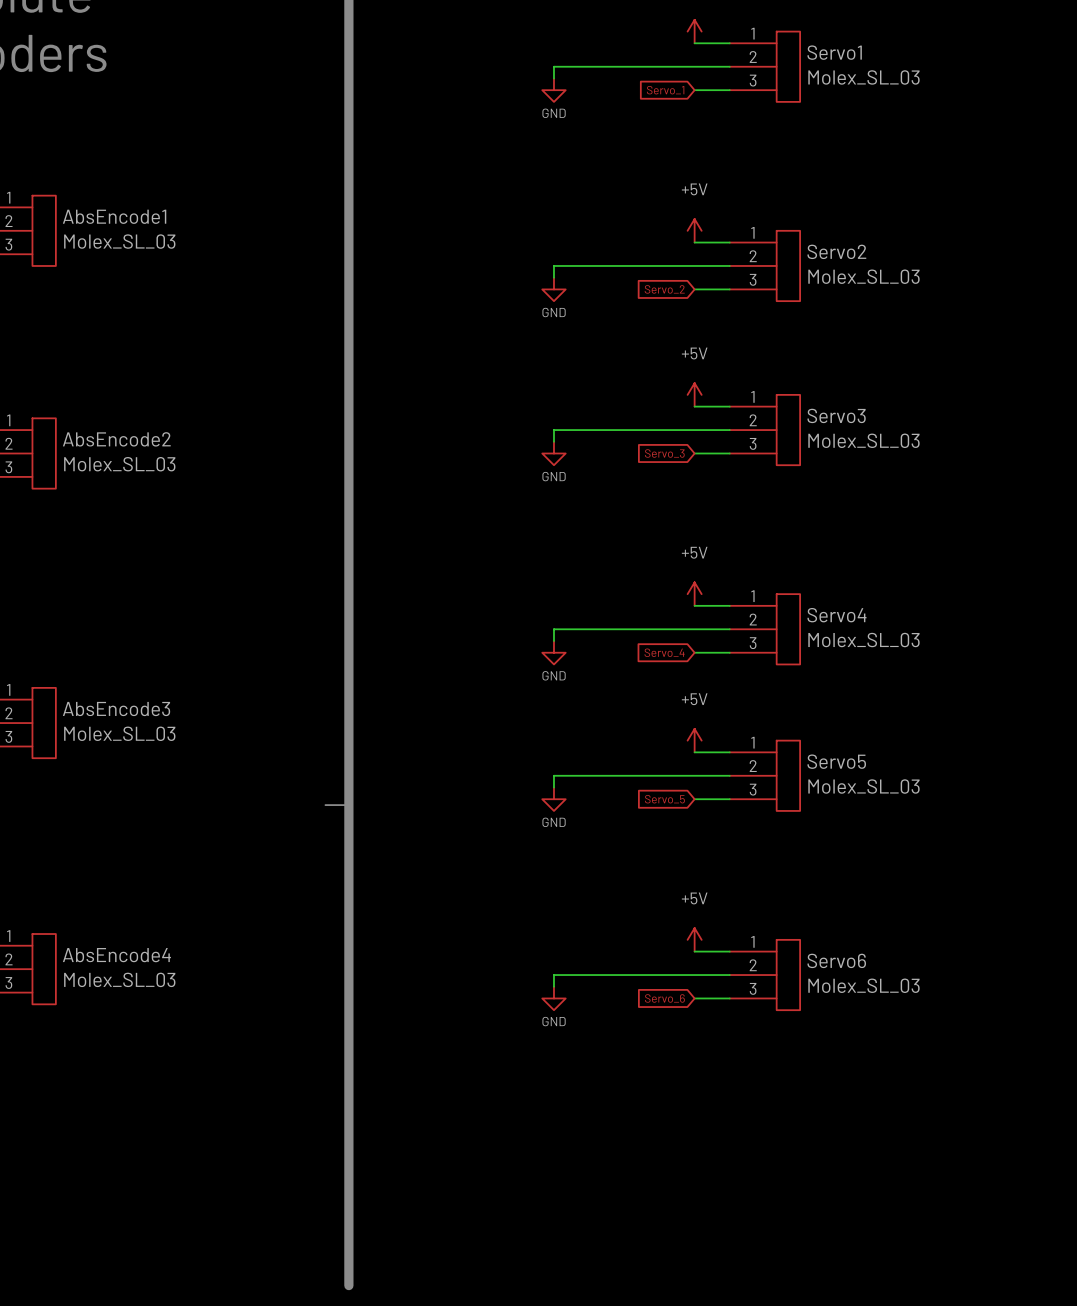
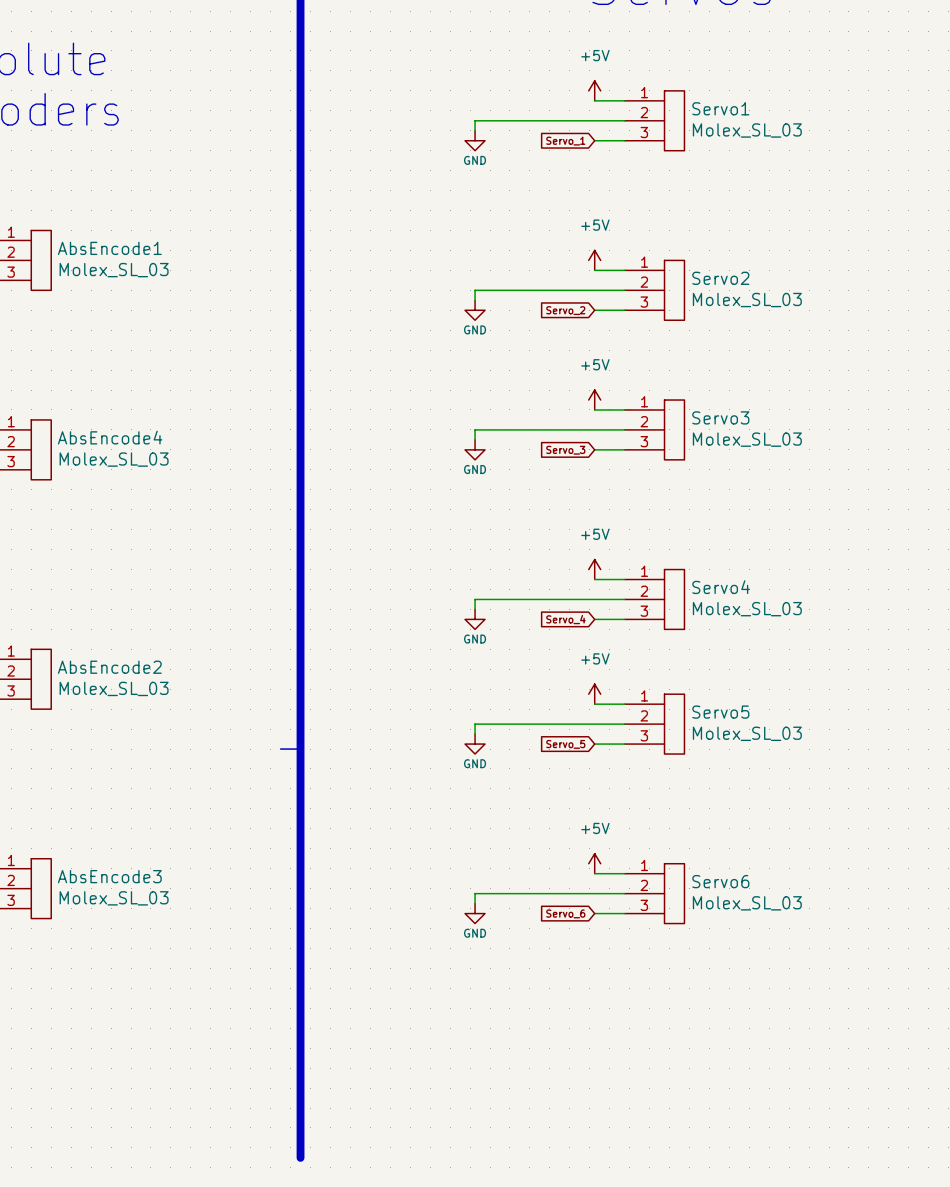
AbsEncode2 name: AbsEncode2 (116, 439) -> AbsEncode4 (110, 437)
AbsEncode3 name: AbsEncode3 (116, 709) -> AbsEncode2 (109, 667)
AbsEncode4 name: AbsEncode4 (116, 955) -> AbsEncode3 (109, 876)

